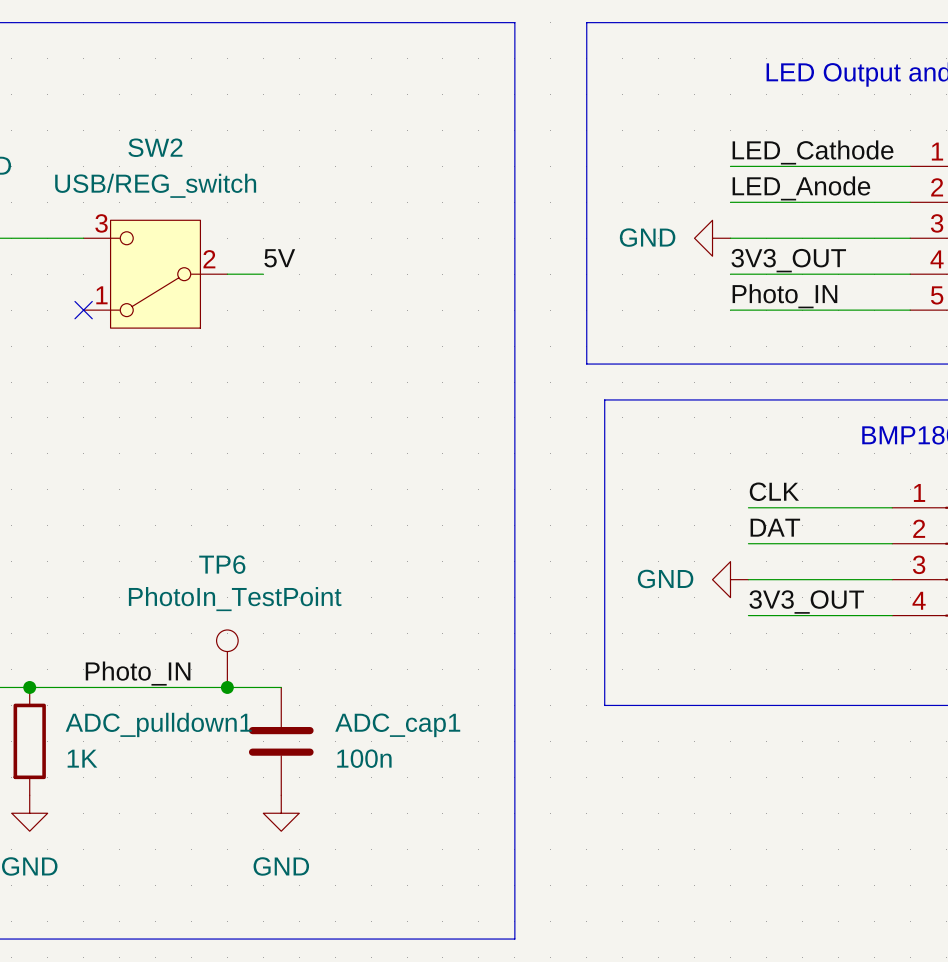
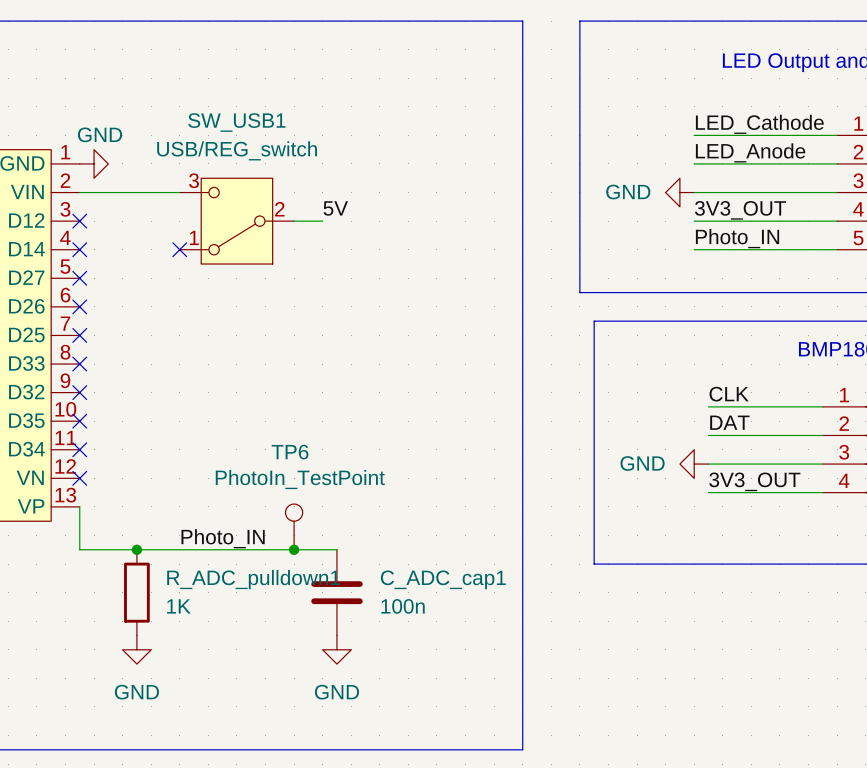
SW2 name: SW2 (155, 147) -> SW_USB1 (236, 122)
ADC_pulldown1 name: ADC_pulldown1 (158, 724) -> R_ADC_pulldown1 (253, 579)
ADC_cap1 name: ADC_cap1 (397, 725) -> C_ADC_cap1 (443, 579)

